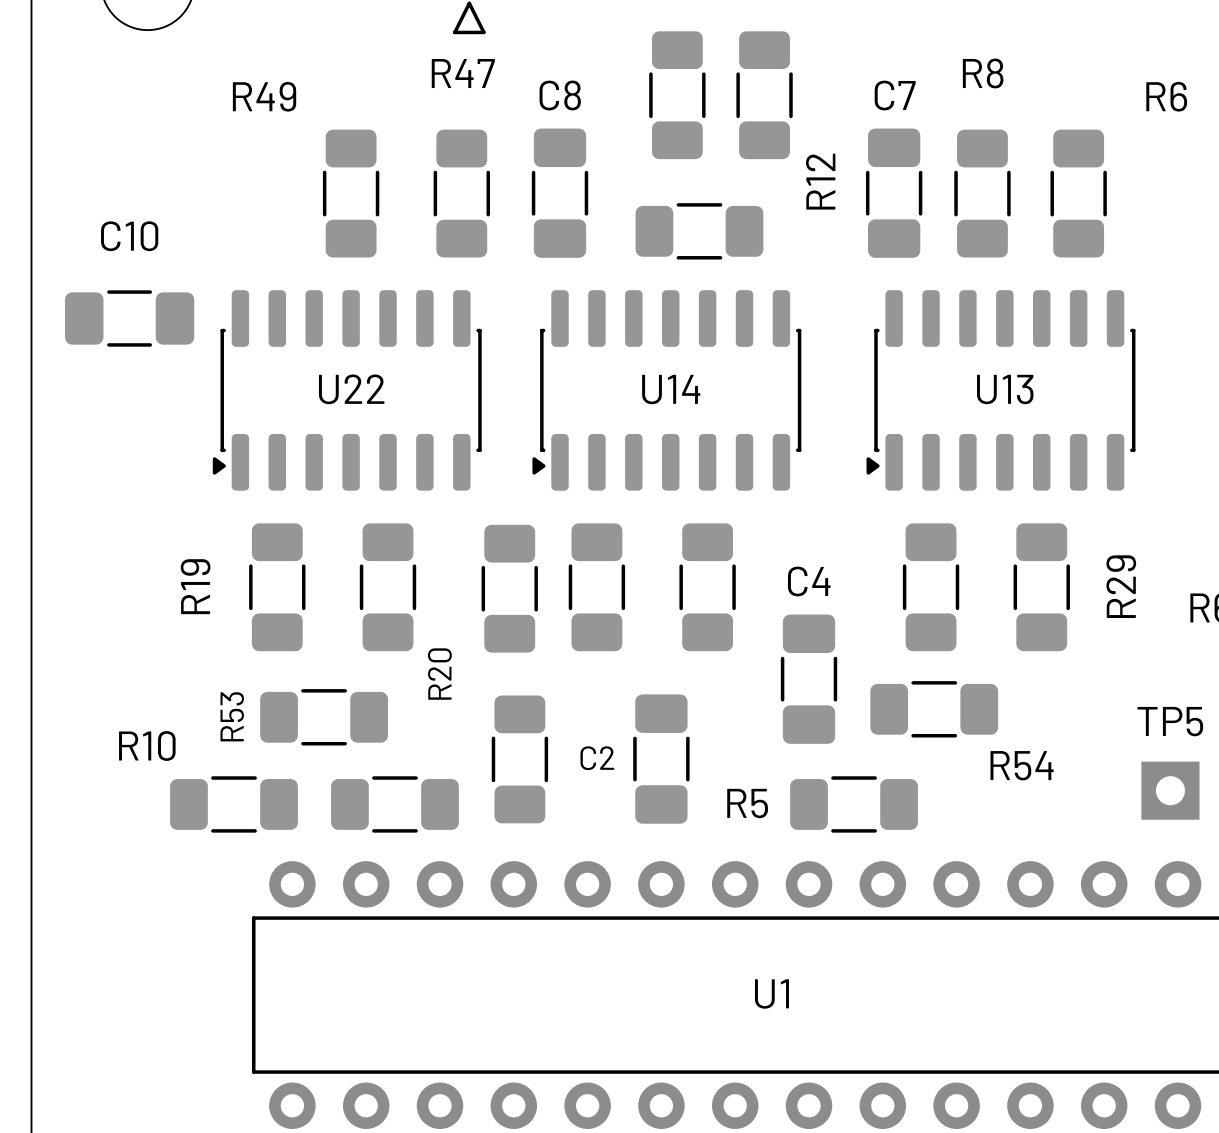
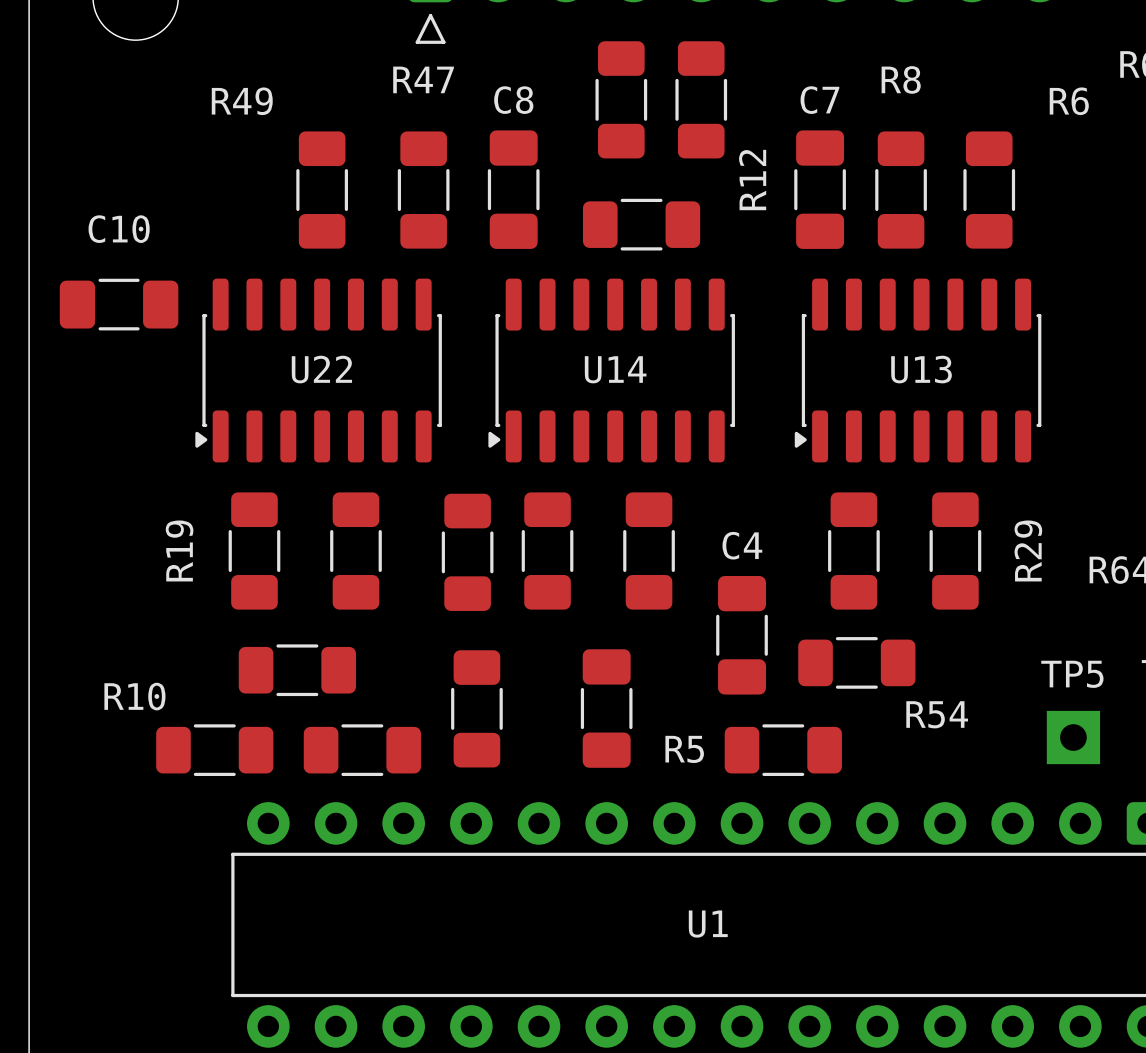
R20 name: R20 (439, 674) -> none
R53 name: R53 (232, 716) -> none
C2 name: C2 (597, 758) -> none

